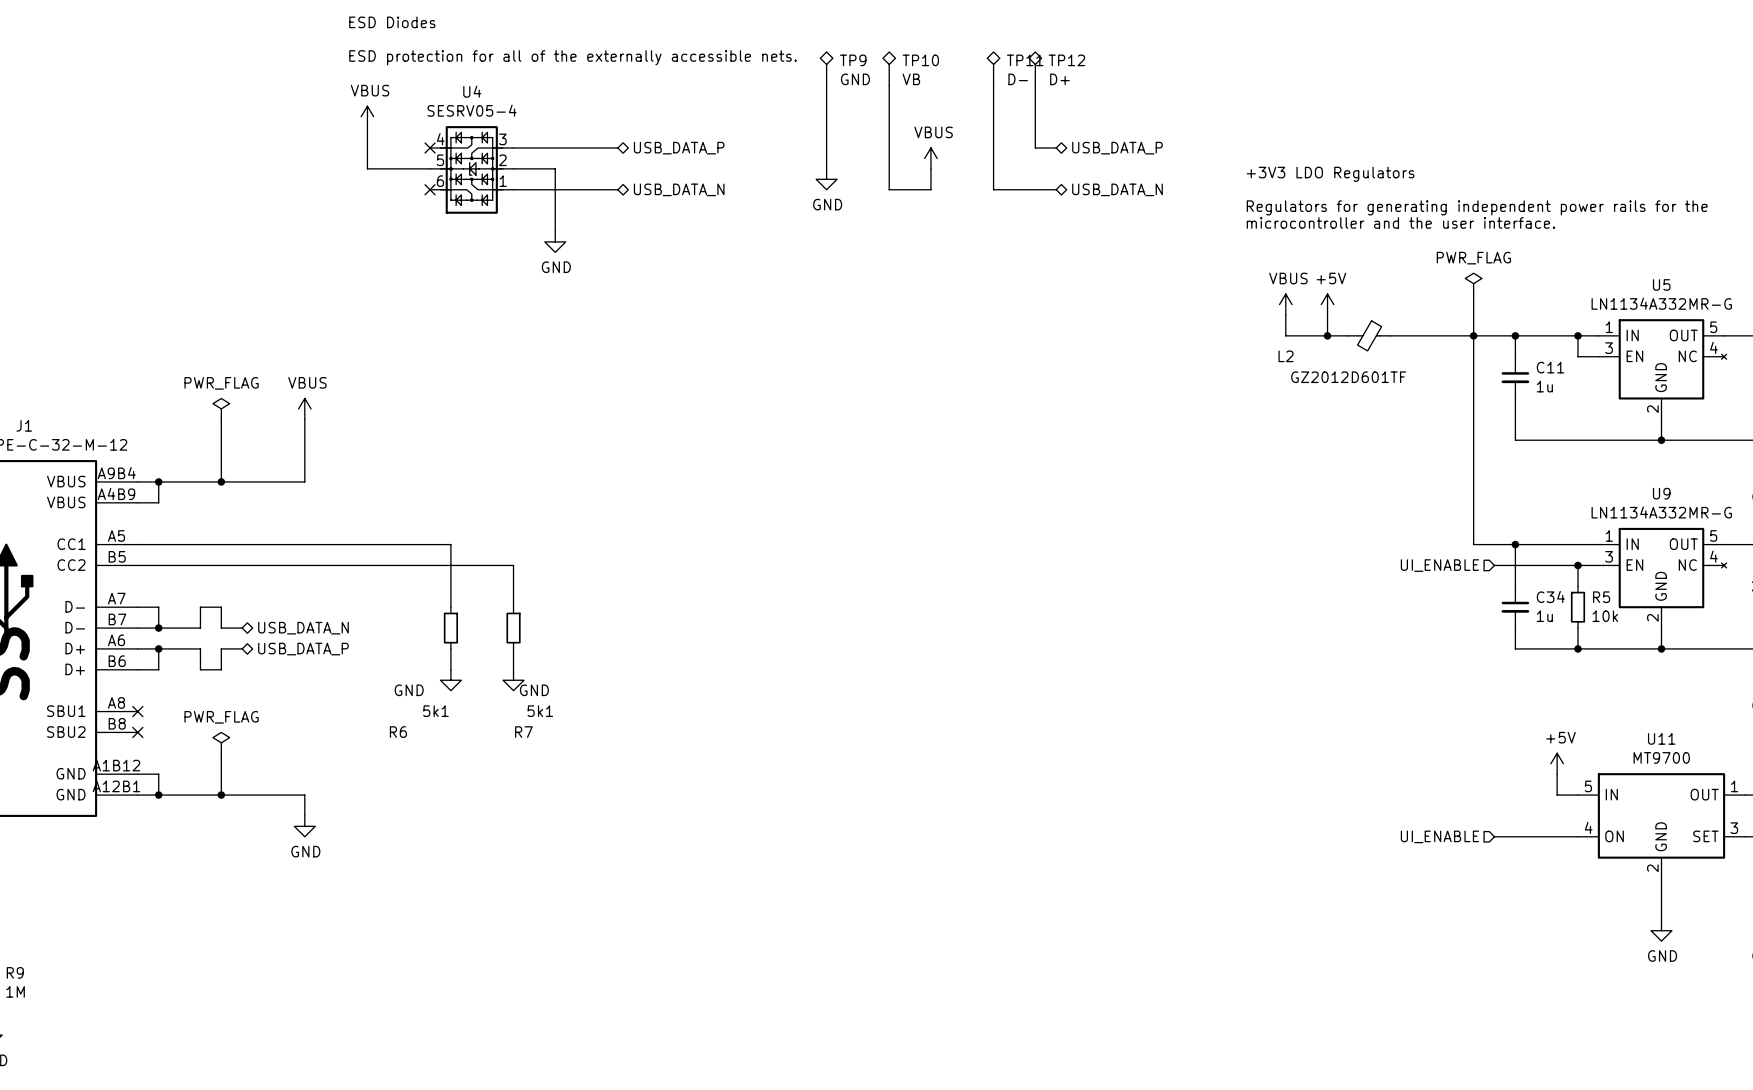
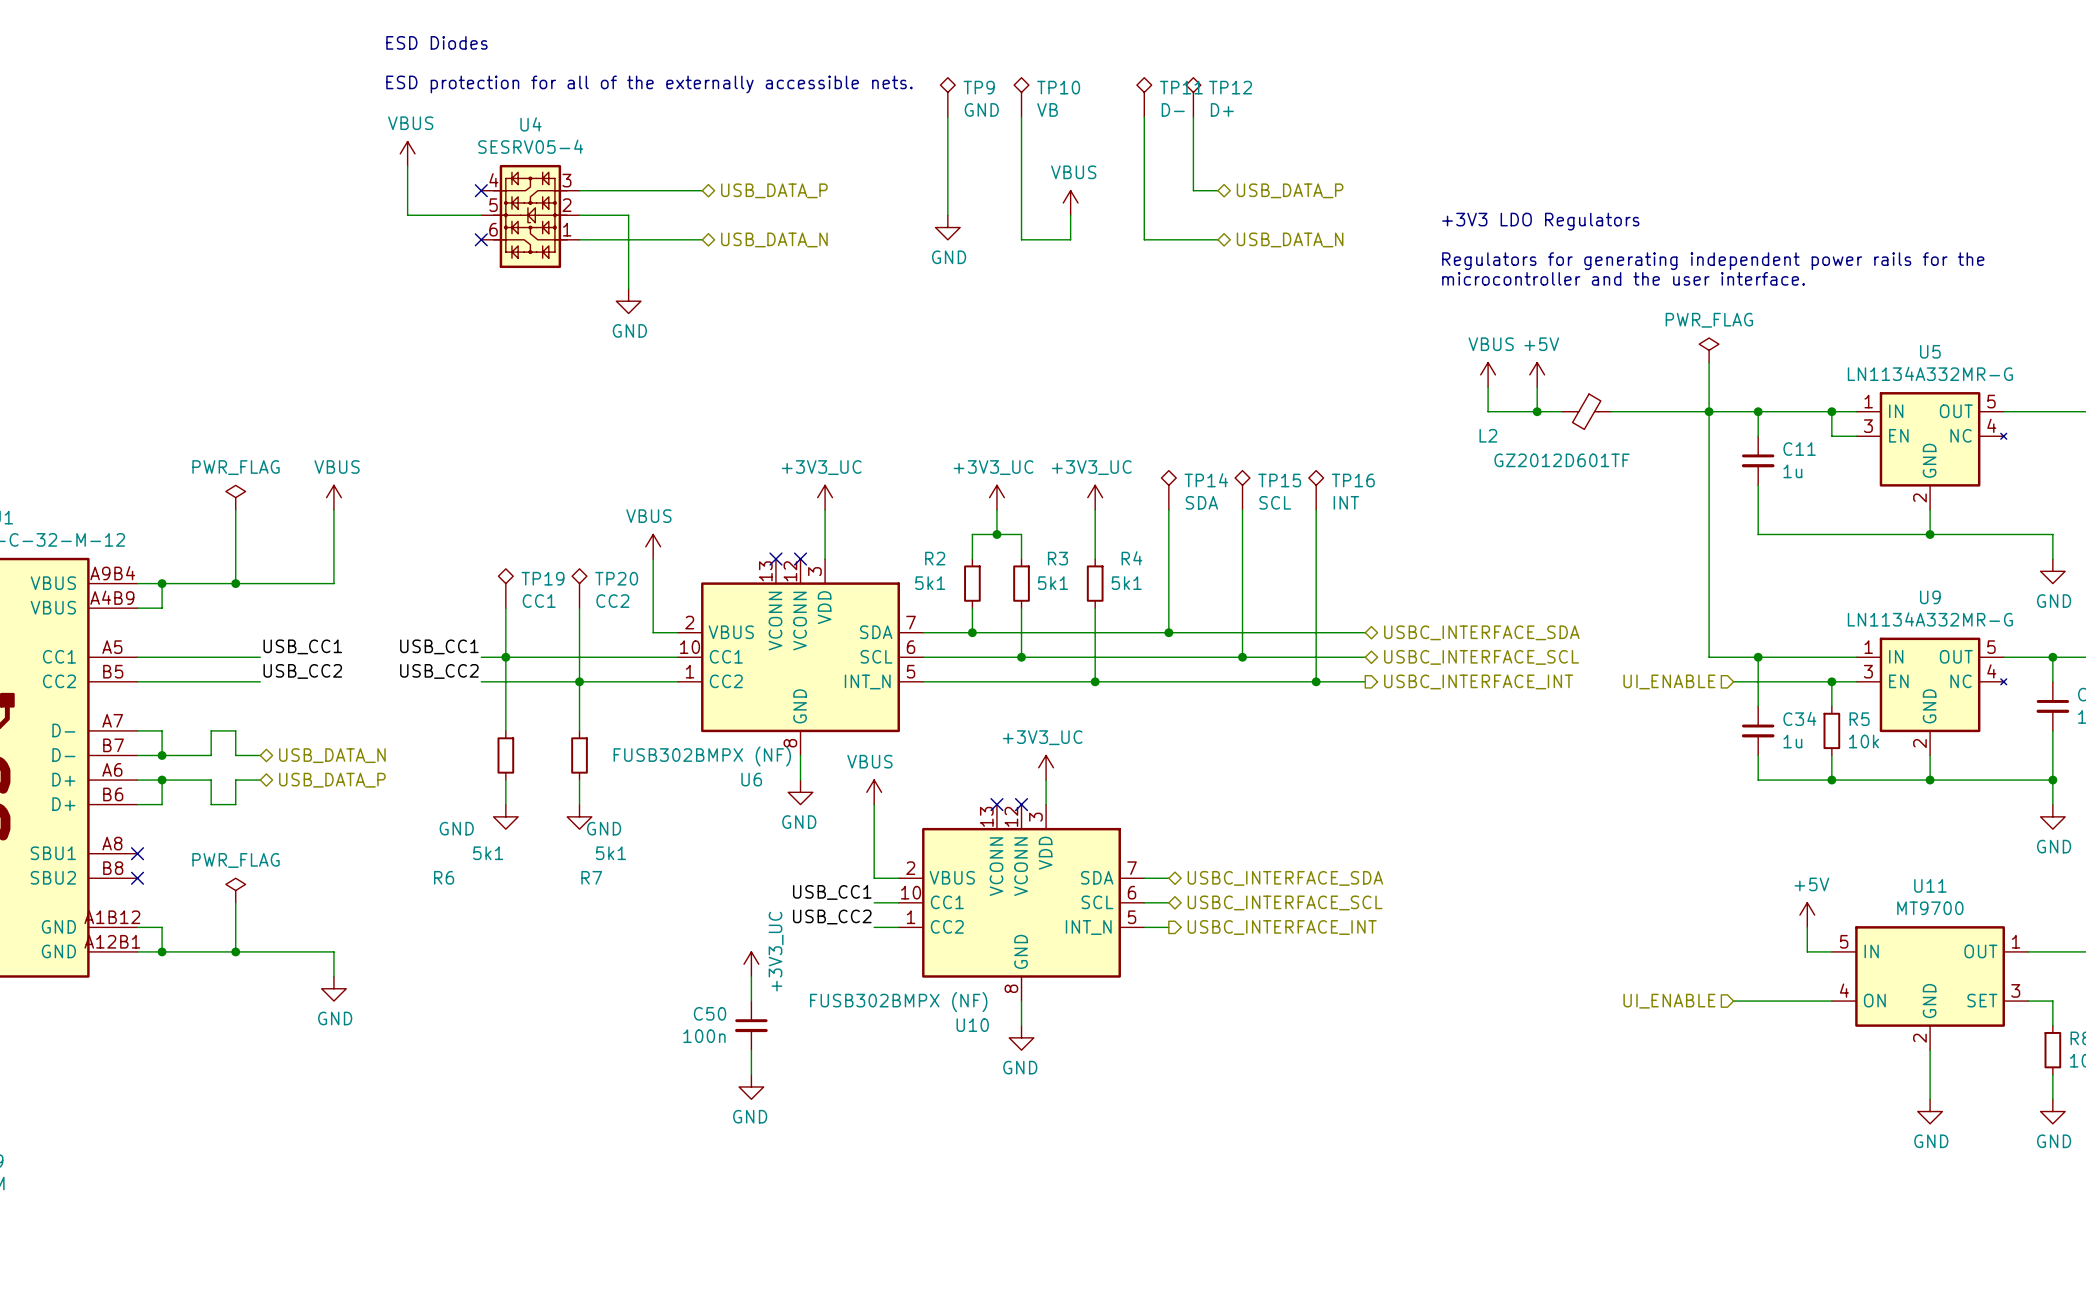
TP14: none -> SDA (1168, 490)
TP15: none -> SCL (1242, 490)
TP16: none -> INT (1316, 490)
power symbol: none -> +3V3_UC (825, 497)
power symbol: none -> +3V3_UC (996, 497)
power symbol: none -> +3V3_UC (1095, 497)
wire: none -> (825, 509) (825, 559)
wire: none -> (996, 509) (996, 534)
wire: none -> (1095, 509) (1095, 559)
wire: none -> (1168, 509) (1168, 632)
wire: none -> (1242, 509) (1242, 657)
wire: none -> (1316, 509) (1316, 681)
junction: none -> (996, 534)
power symbol: none -> VBUS (653, 546)
wire: none -> (653, 559) (653, 632) (677, 632)
no-connect mark: none -> (775, 559)
no-connect mark: none -> (800, 559)
wire: none -> (972, 559) (972, 534) (1021, 534) (1021, 559)
R2: none -> 5k1 (972, 583)
R3: none -> 5k1 (1021, 583)
R4: none -> 5k1 (1095, 583)
TP19: none -> CC1 (505, 588)
TP20: none -> CC2 (579, 588)
wire: none -> (505, 608) (505, 657) (677, 657)
wire: none -> (579, 608) (579, 681) (677, 681)
wire: none -> (972, 608) (972, 632)
wire: none -> (1021, 608) (1021, 657)
wire: none -> (1095, 608) (1095, 681)
wire: none -> (923, 632) (1365, 632)
junction: none -> (972, 632)
junction: none -> (1168, 632)
hierarchical label: none -> USBC_INTERFACE_SDA (1481, 632)
label: none -> USB_CC1 (302, 646)
label: none -> USB_CC1 (439, 646)
wire: (242, 544) (430, 544) -> none
junction: none -> (505, 657)
U6: none -> FUSB302BMPX (NF) (800, 657)
wire: none -> (923, 657) (1365, 657)
junction: none -> (1021, 657)
junction: none -> (1242, 657)
hierarchical label: none -> USBC_INTERFACE_SCL (1481, 657)
label: none -> USB_CC2 (302, 671)
label: none -> USB_CC2 (439, 671)
wire: (242, 565) (430, 565) -> none
junction: none -> (579, 681)
wire: none -> (923, 681) (1365, 681)
junction: none -> (1095, 681)
junction: none -> (1316, 681)
hierarchical label: none -> USBC_INTERFACE_INT (1478, 681)
wire: none -> (800, 755) (800, 780)
power symbol: none -> +3V3_UC (1046, 767)
wire: none -> (1046, 780) (1046, 804)
power symbol: none -> GND (800, 792)
power symbol: none -> VBUS (874, 792)
wire: none -> (874, 804) (874, 878) (898, 878)
no-connect mark: none -> (996, 804)
no-connect mark: none -> (1021, 804)
wire: none -> (1144, 878) (1168, 878)
hierarchical label: none -> USBC_INTERFACE_SDA (1285, 878)
label: none -> USB_CC1 (832, 892)
wire: none -> (874, 902) (898, 902)
U10: none -> FUSB302BMPX (NF) (1021, 902)
wire: none -> (1144, 902) (1168, 902)
hierarchical label: none -> USBC_INTERFACE_SCL (1285, 902)
label: none -> USB_CC2 (832, 917)
wire: none -> (874, 927) (898, 927)
wire: none -> (1144, 927) (1168, 927)
hierarchical label: none -> USBC_INTERFACE_INT (1282, 927)
power symbol: none -> +3V3_UC (751, 964)
wire: none -> (751, 976) (751, 1001)
wire: none -> (1021, 1001) (1021, 1025)
C50: none -> 100n (751, 1025)
power symbol: none -> GND (1021, 1037)
wire: none -> (751, 1050) (751, 1074)
power symbol: none -> GND (751, 1086)

